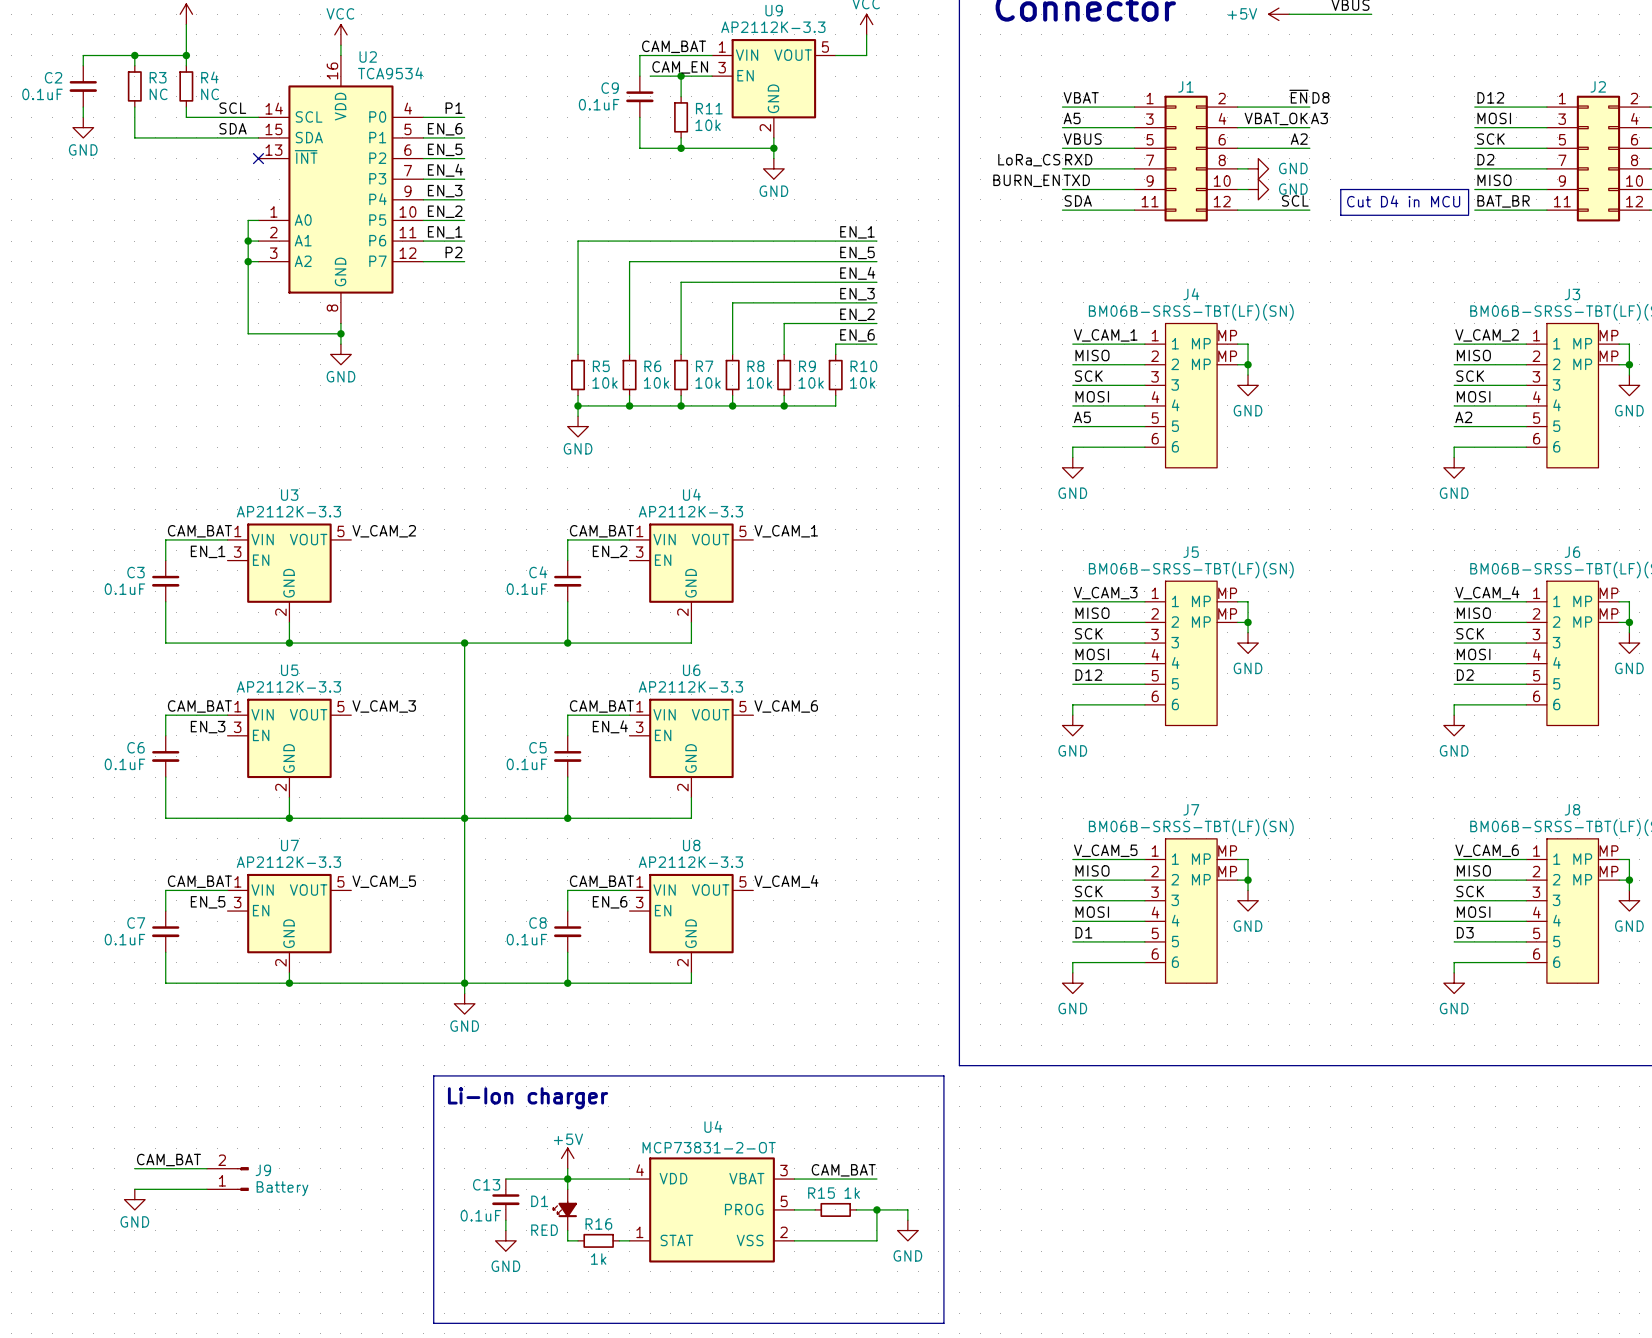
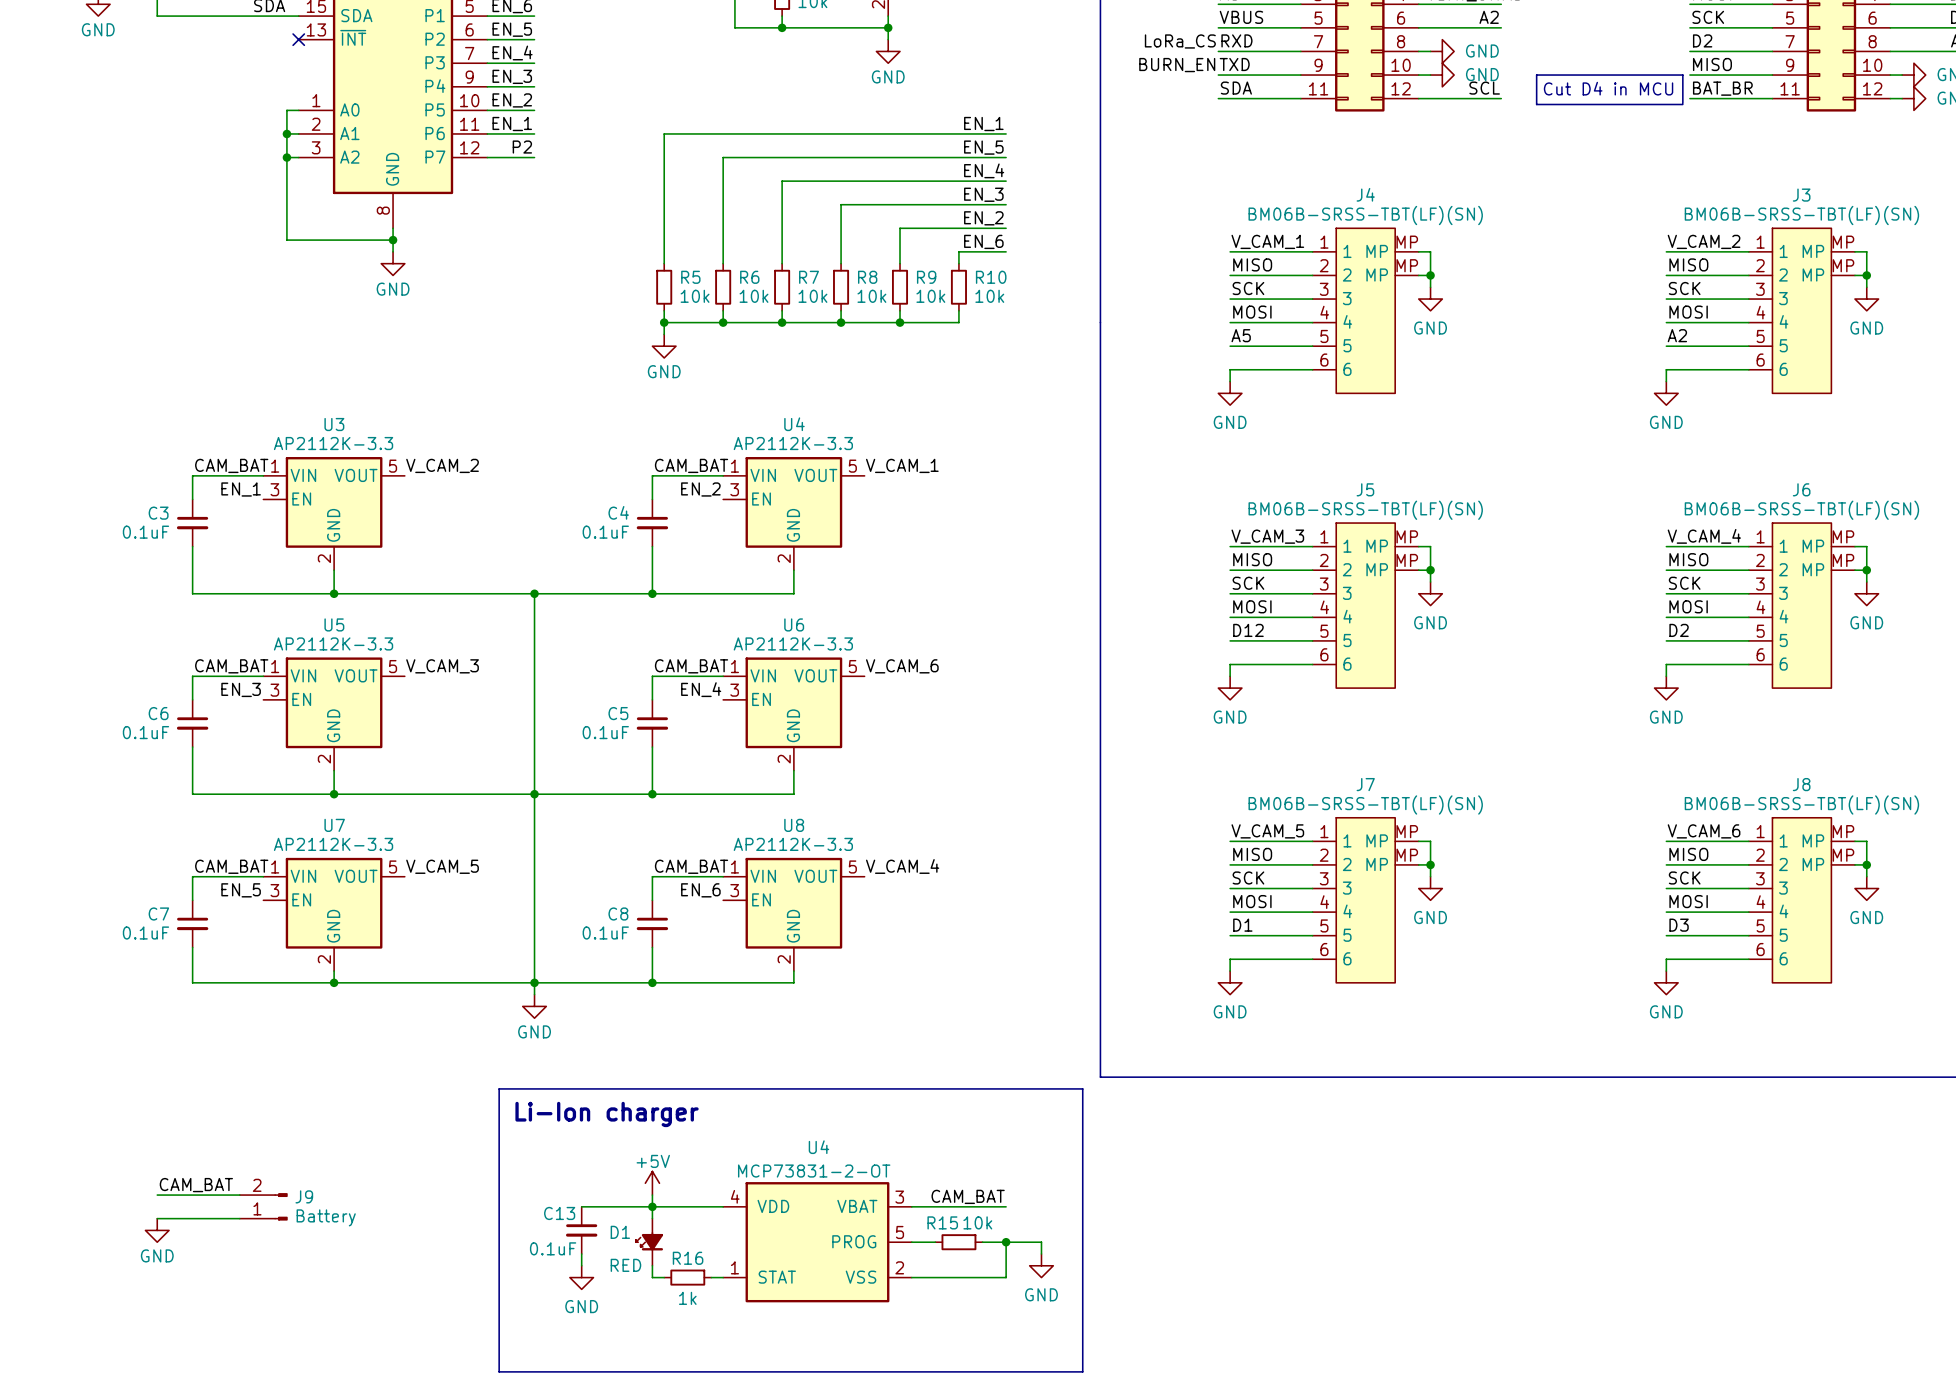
R15 value: 1k (852, 1193) -> 10k (977, 1222)

